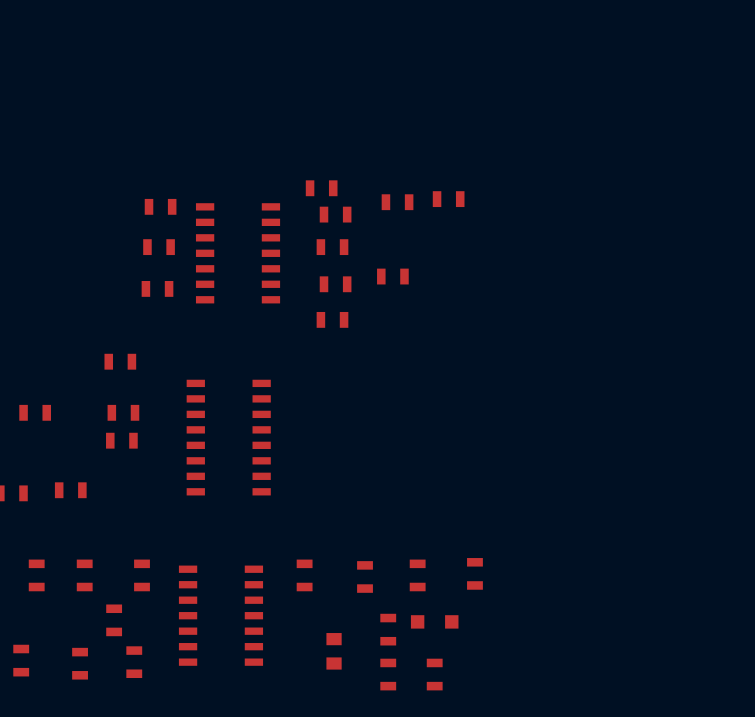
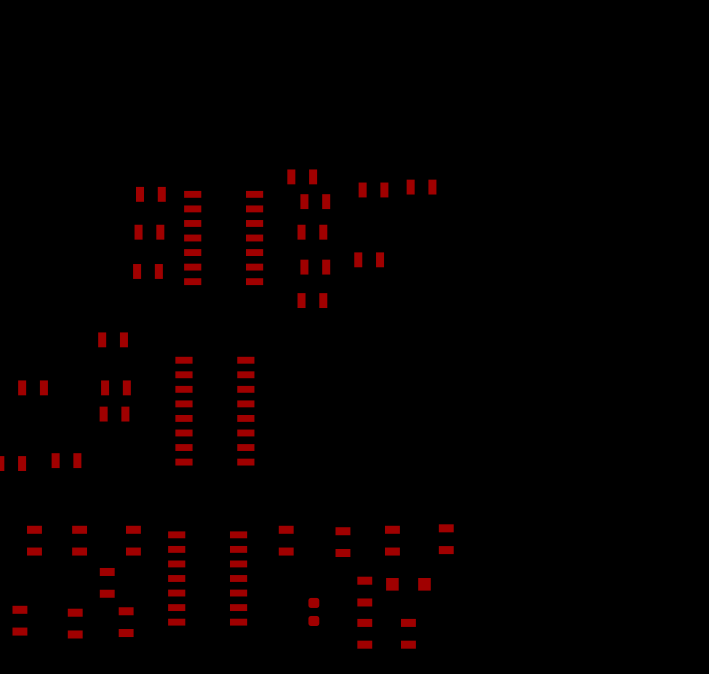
part footprint: [326, 633, 342, 670] -> [308, 597, 320, 626]

